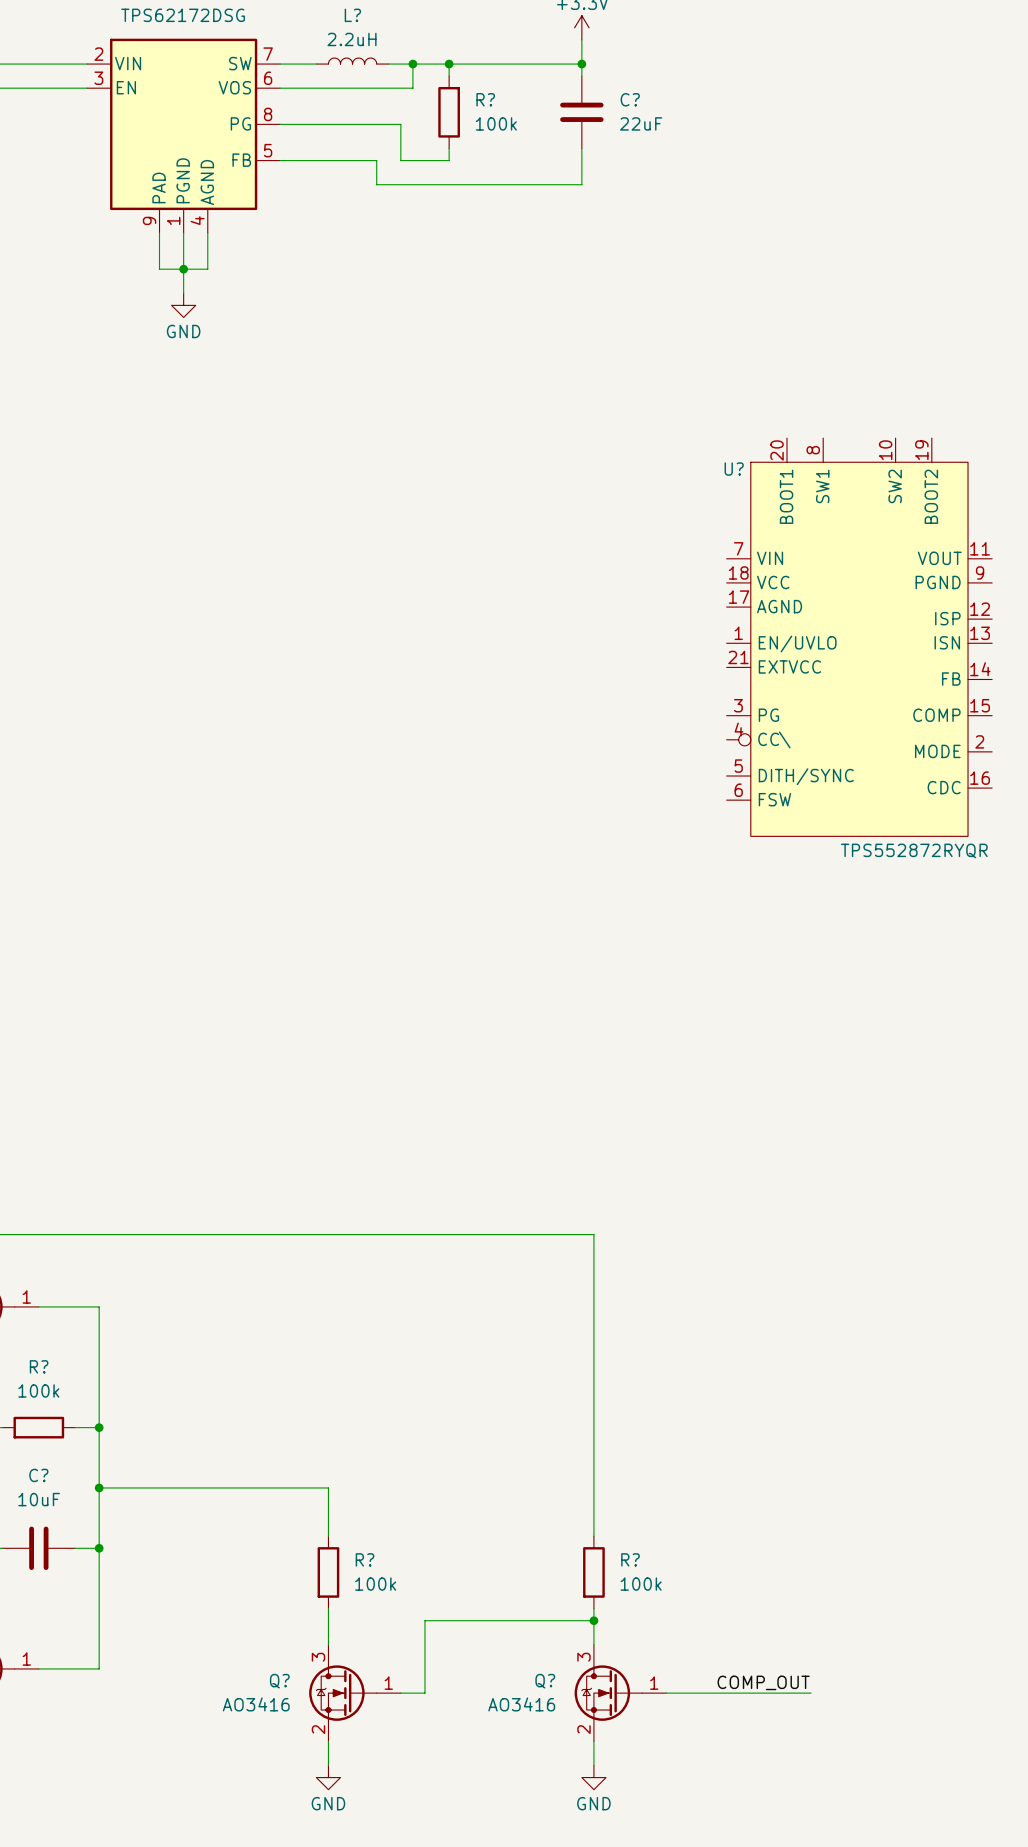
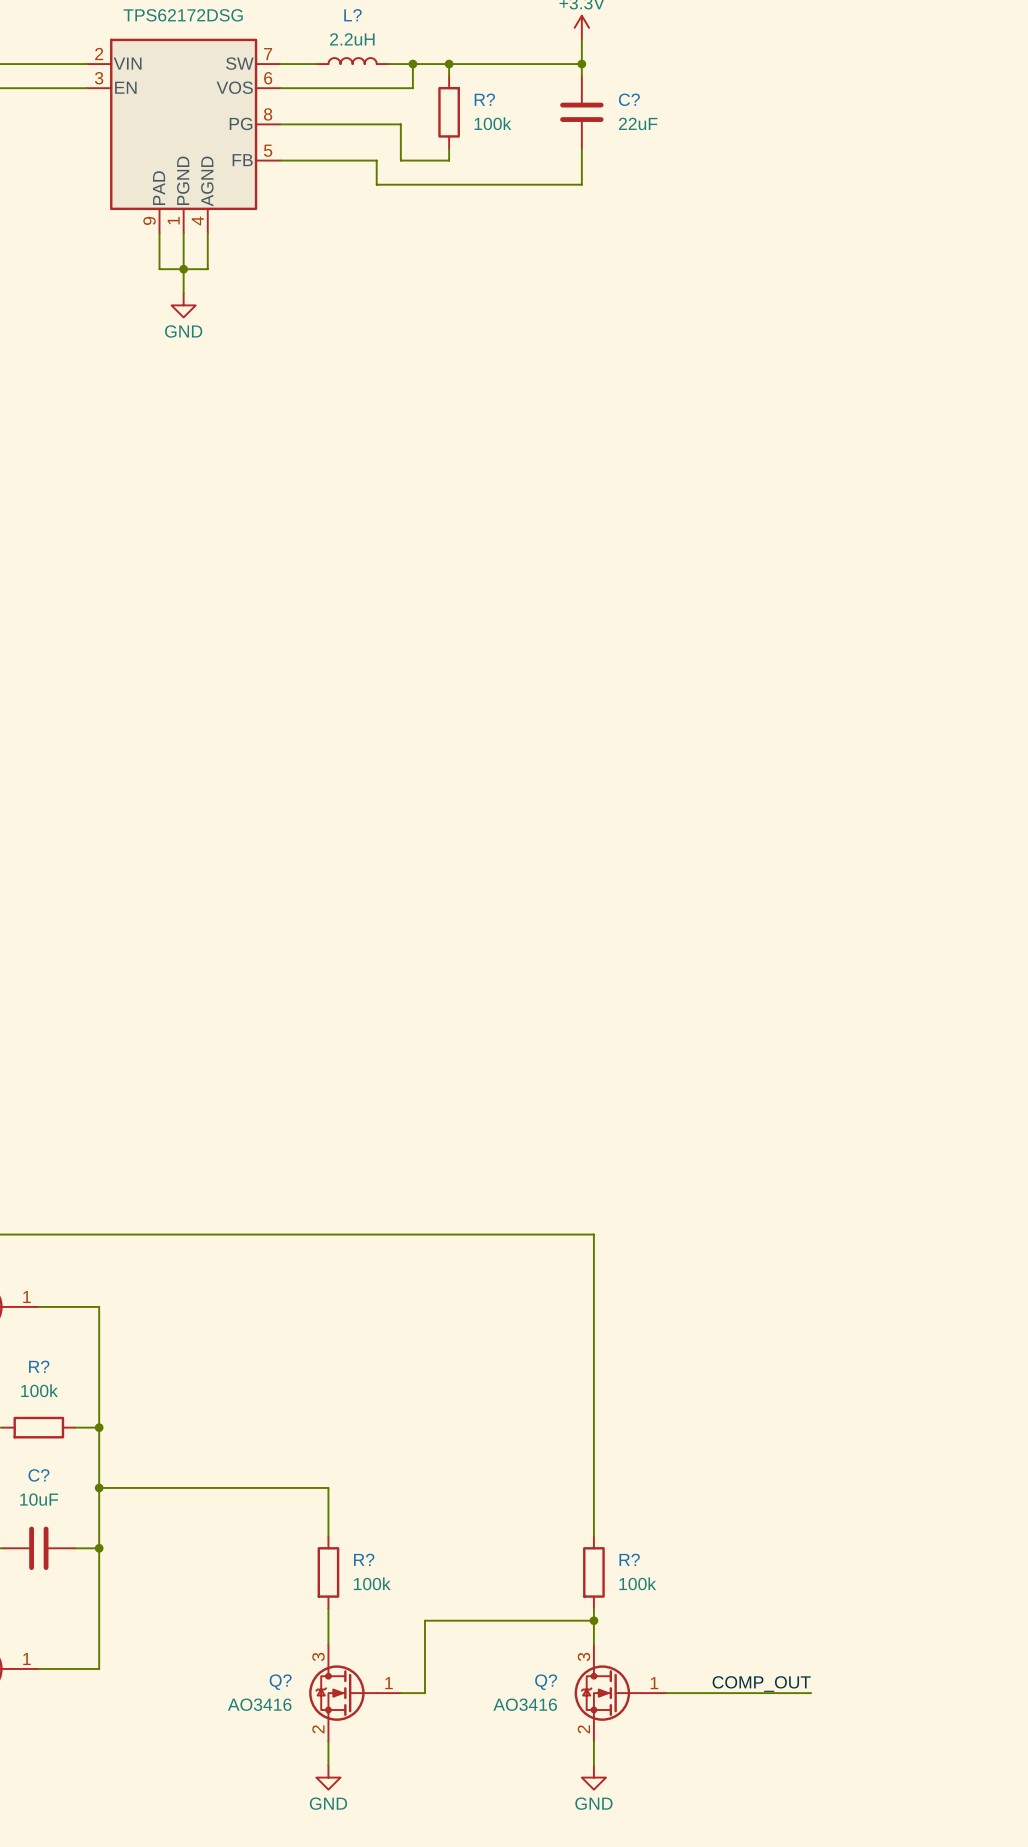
U?: TPS552872RYQR (859, 637) -> none

